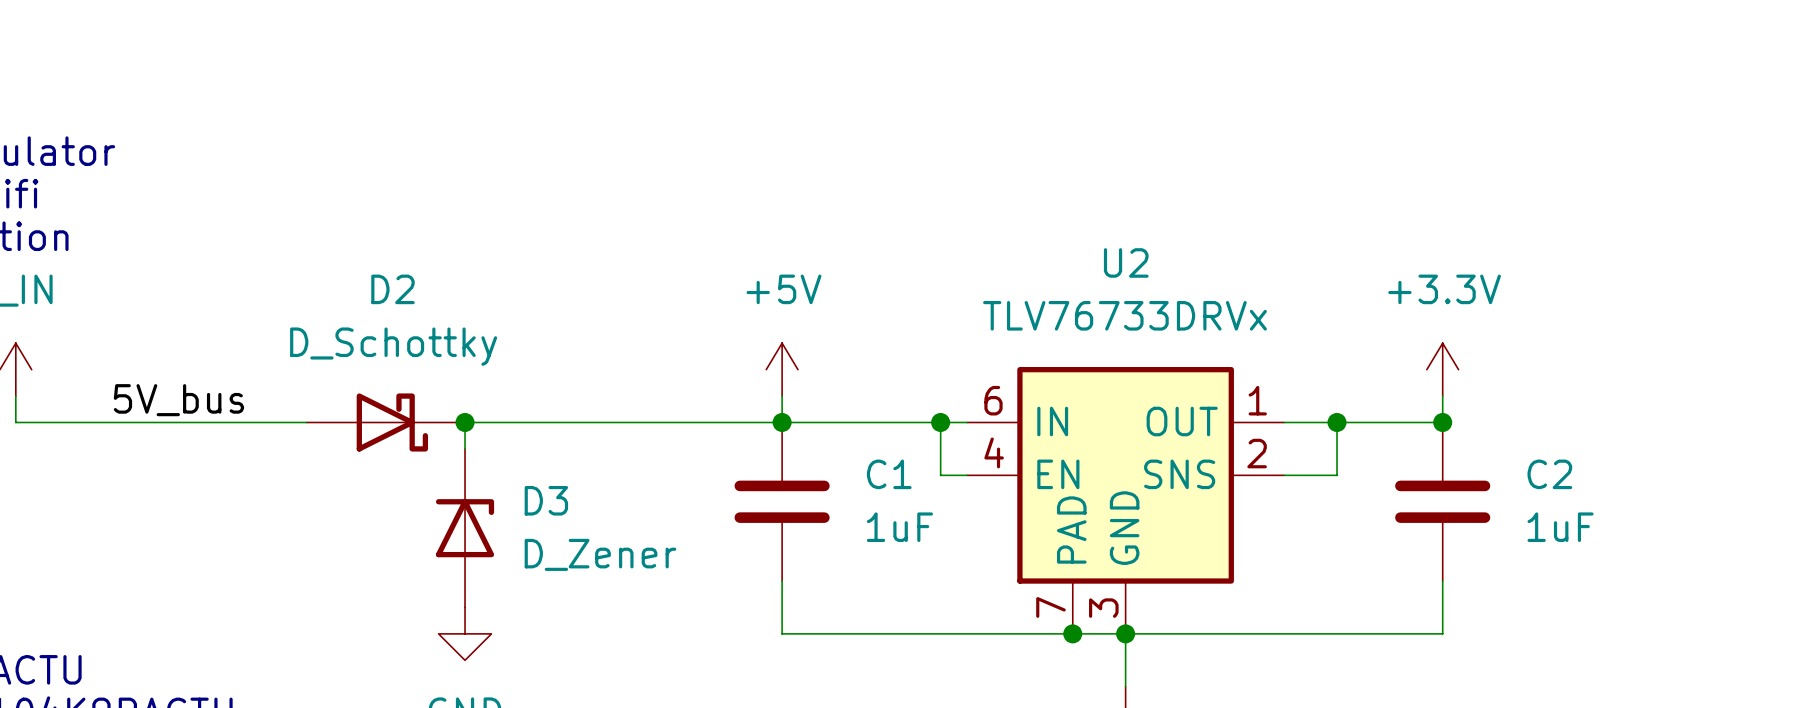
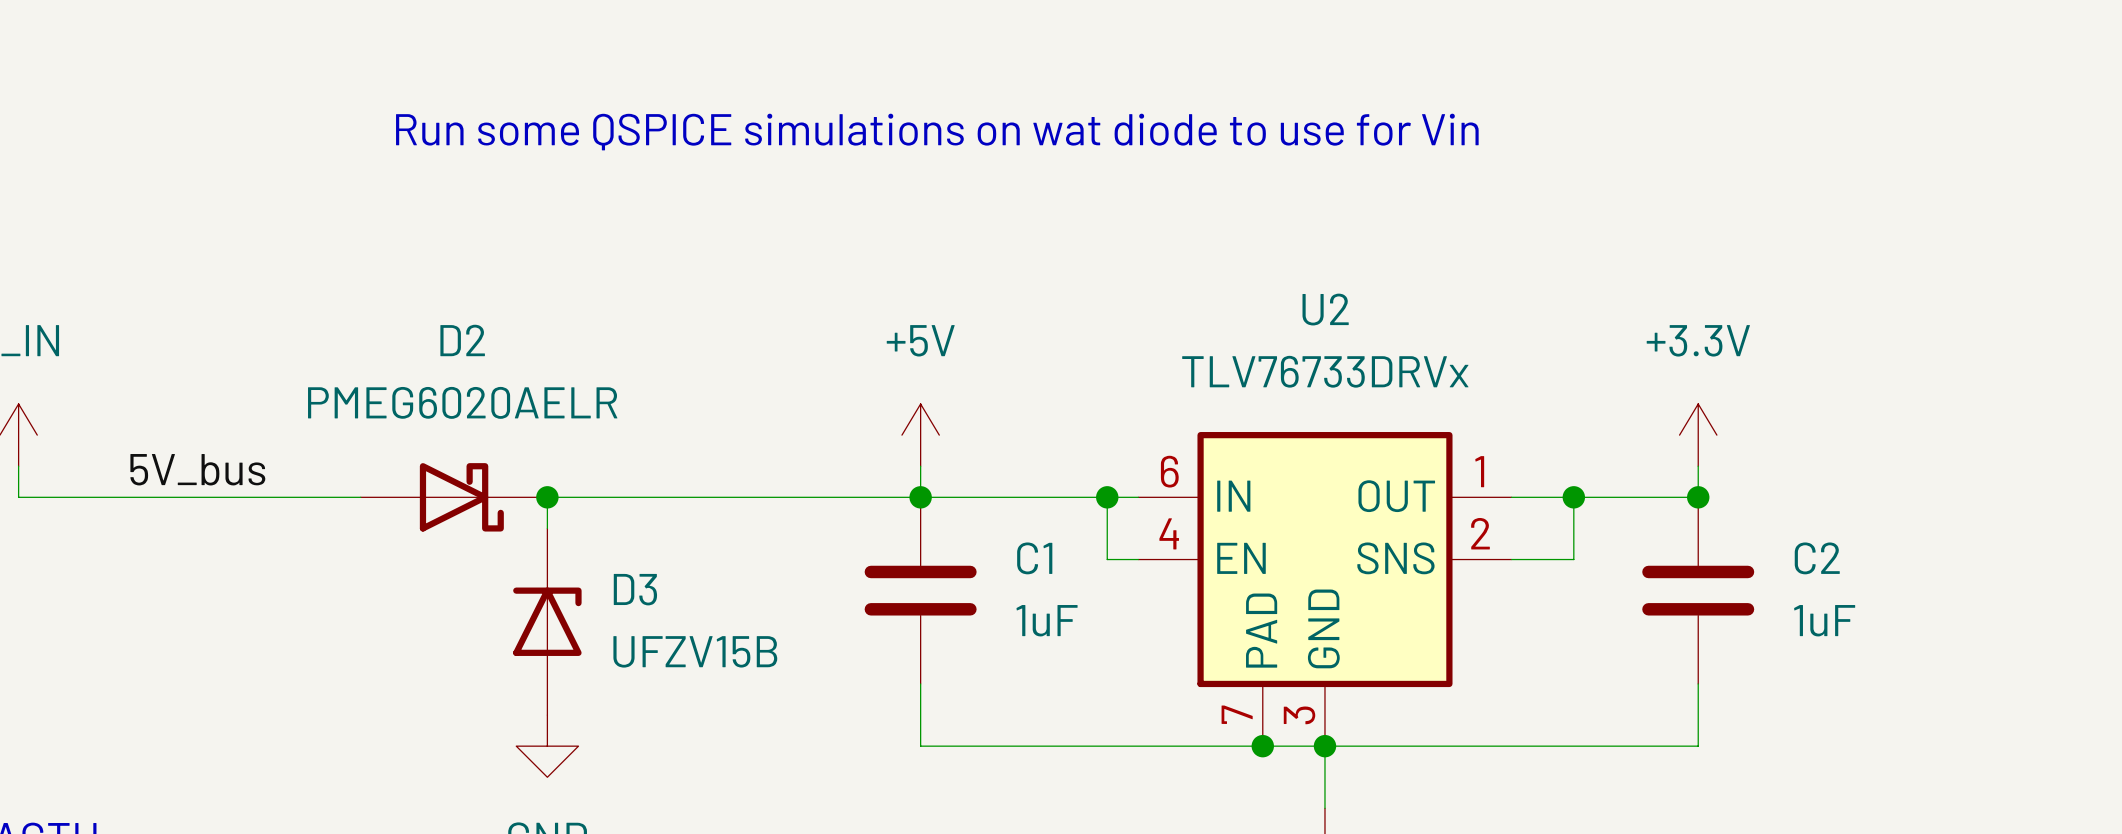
text: none -> Run some QSPICE simulations on wat diode to use for Vin (937, 132)
D2 value: D_Schottky (393, 346) -> PMEG6020AELR (462, 402)
D3 value: D_Zener (600, 554) -> UFZV15B (695, 651)

